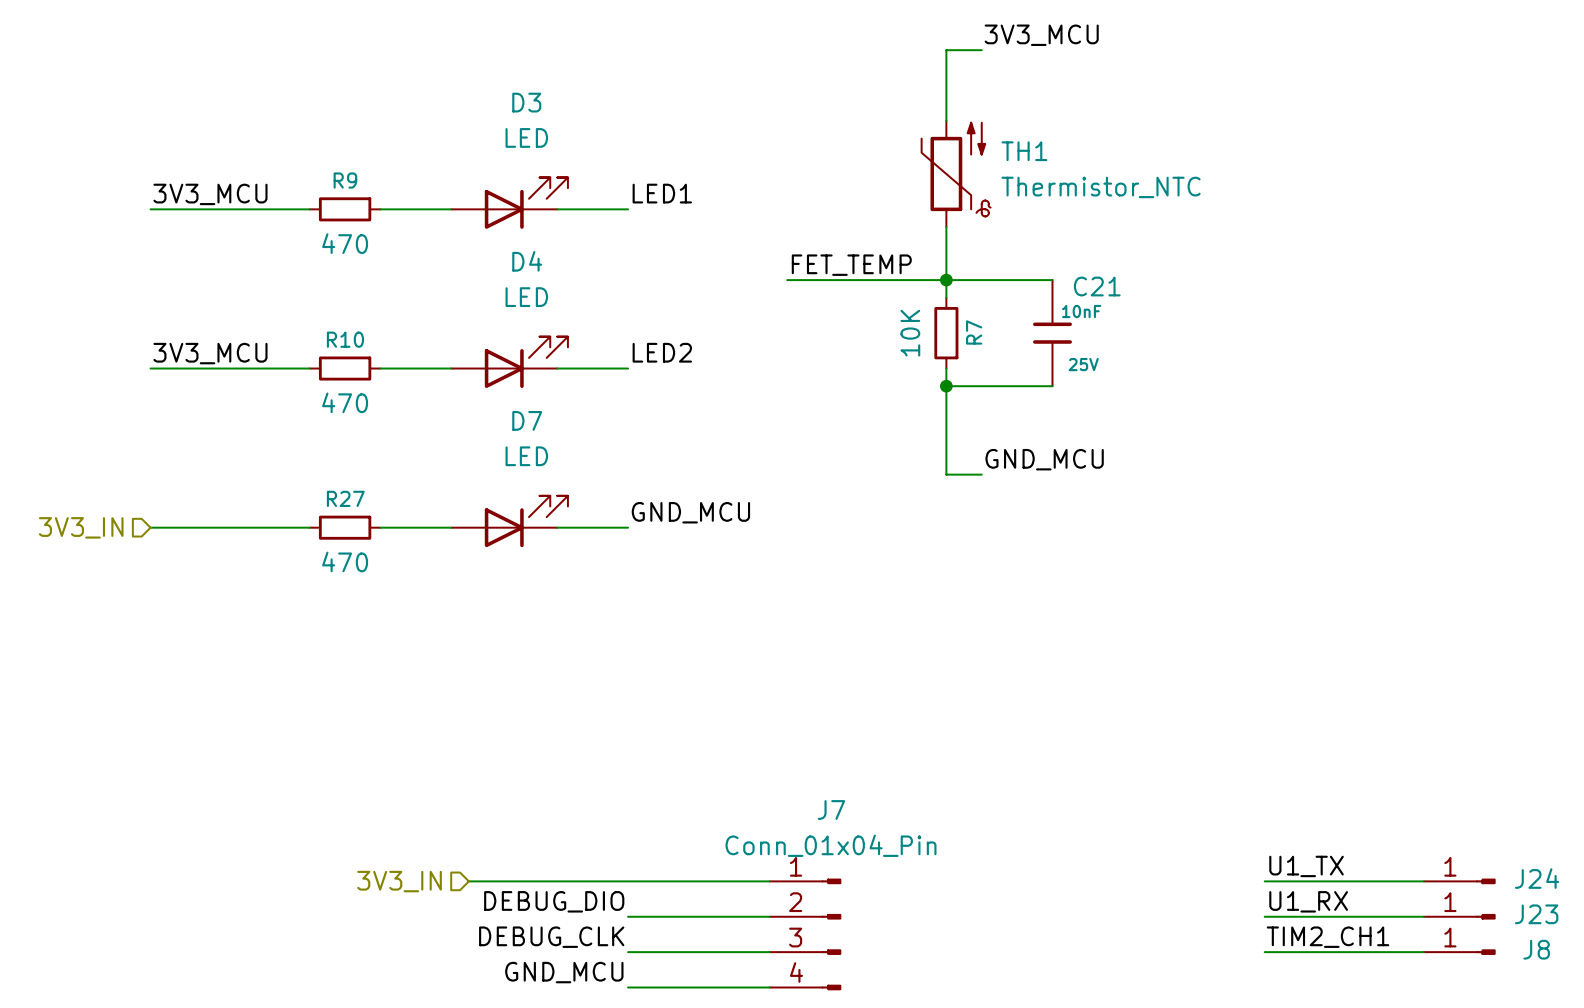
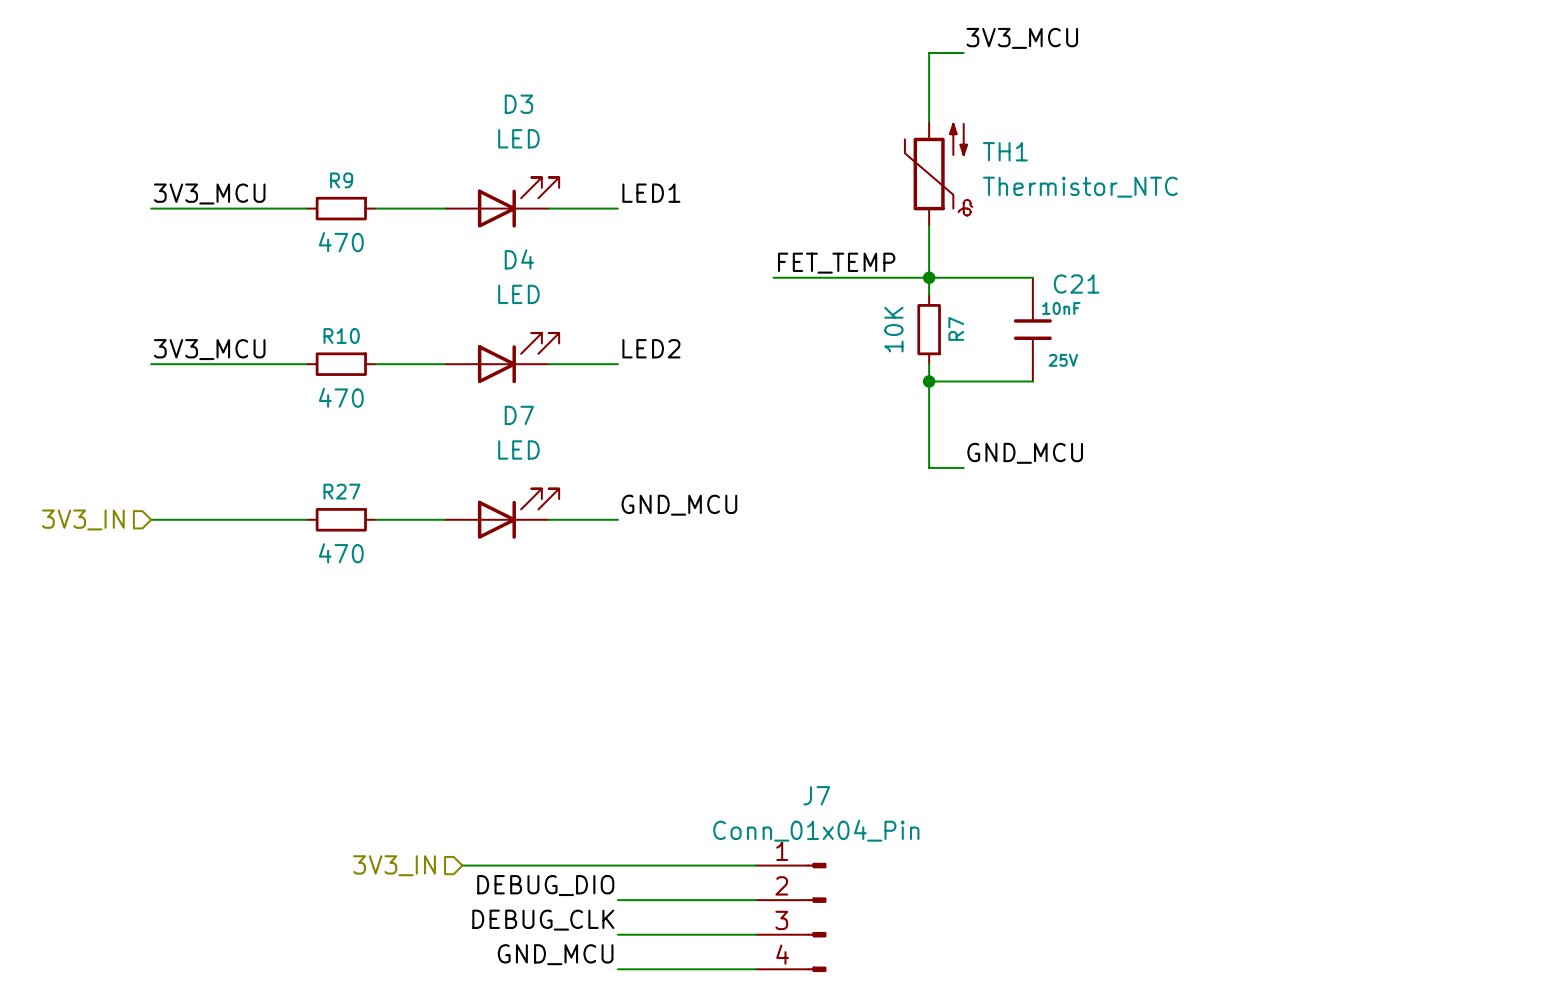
label: U1_TX (1306, 866) -> none
wire: (1264, 881) (1423, 881) -> none
J24: (1459, 881) -> none
label: U1_RX (1308, 901) -> none
wire: (1264, 916) (1423, 916) -> none
J23: (1459, 916) -> none
label: TIM2_CH1 (1328, 937) -> none
wire: (1264, 952) (1423, 952) -> none
J8: (1459, 952) -> none

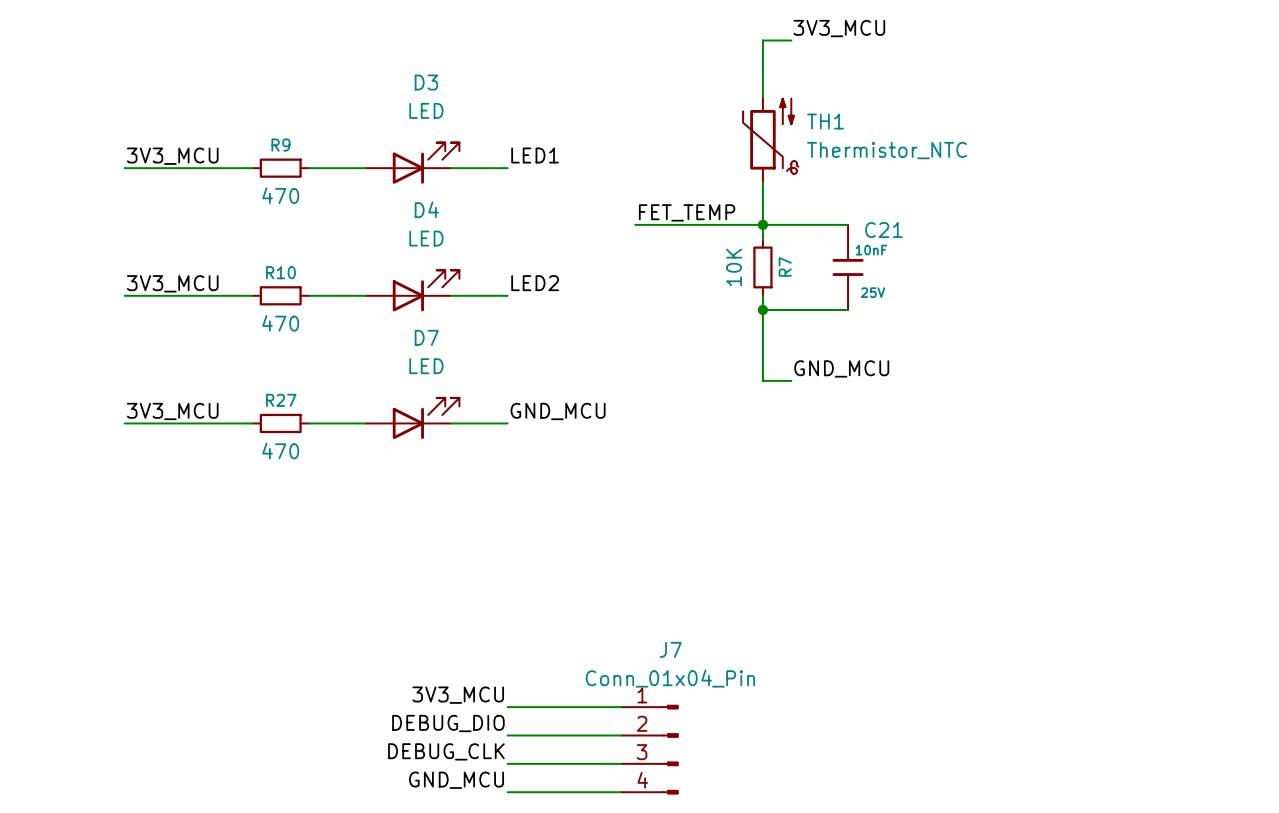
label: none -> 3V3_MCU (172, 411)
hierarchical label: 3V3_IN (83, 519) -> none
label: none -> 3V3_MCU (458, 695)
hierarchical label: 3V3_IN (394, 865) -> none
wire: (462, 865) (617, 865) -> none

